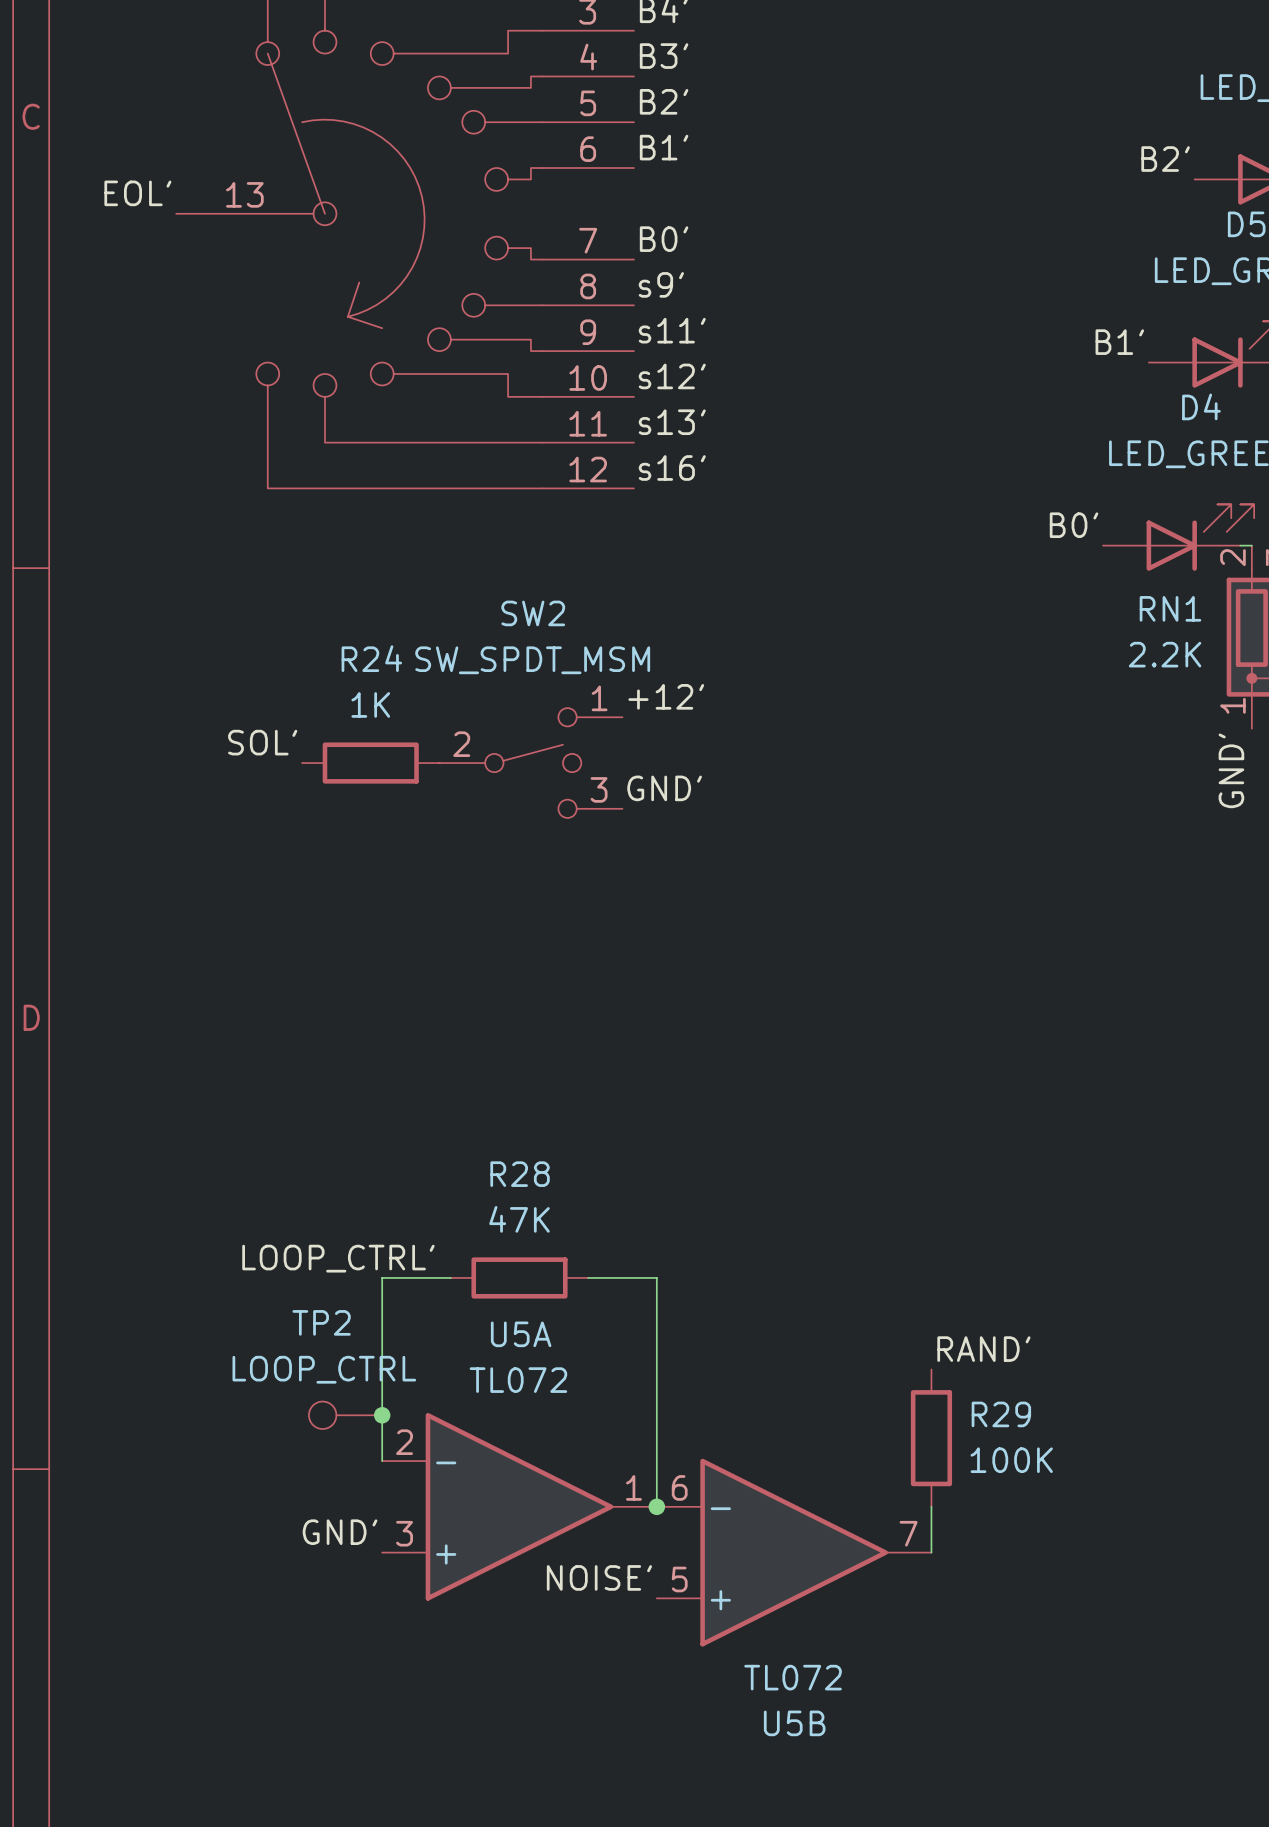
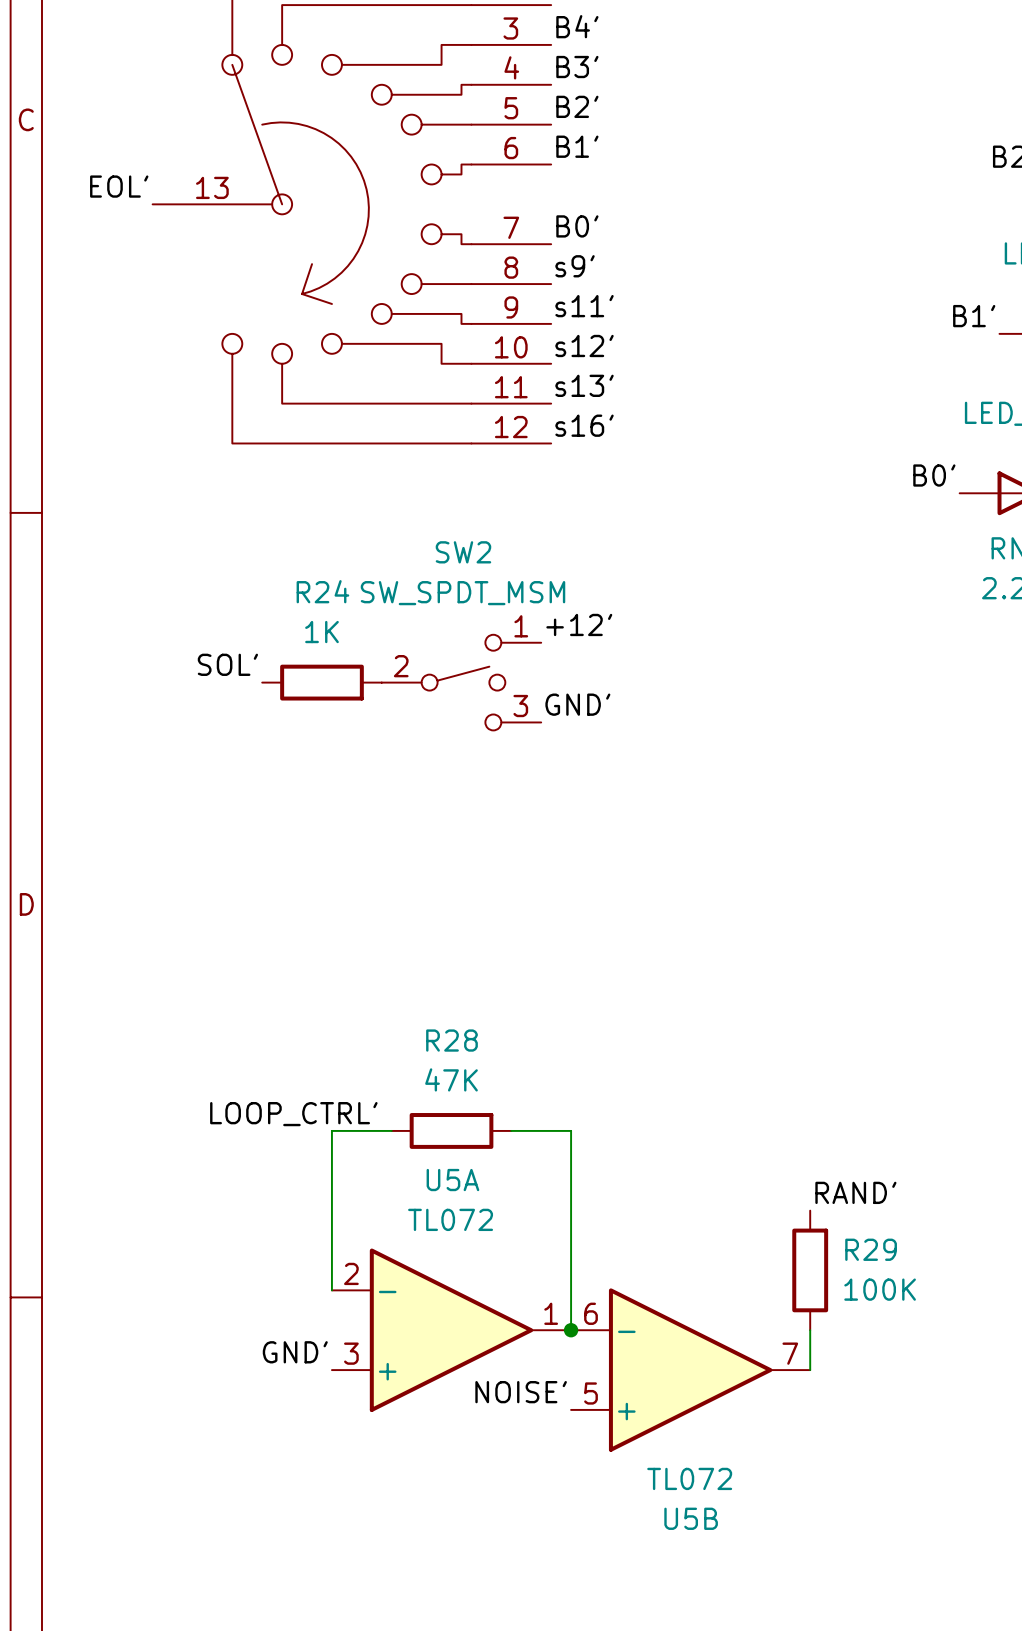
TP2: LOOP_CTRL (345, 1415) -> none
junction: (382, 1415) -> none

